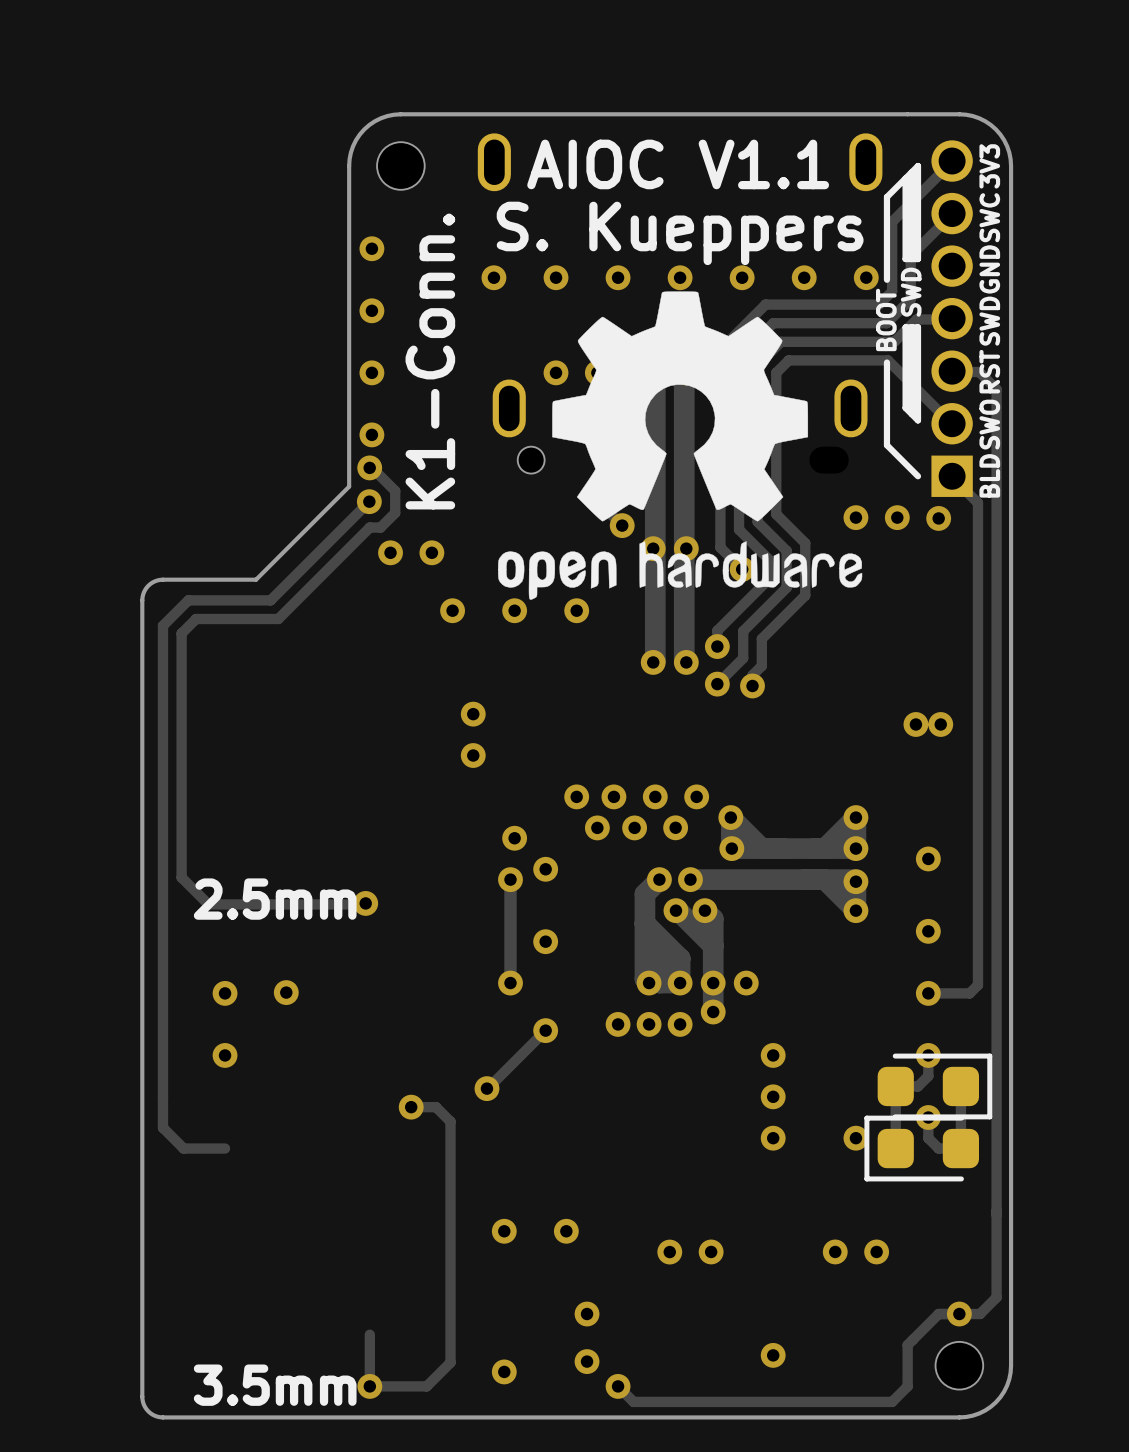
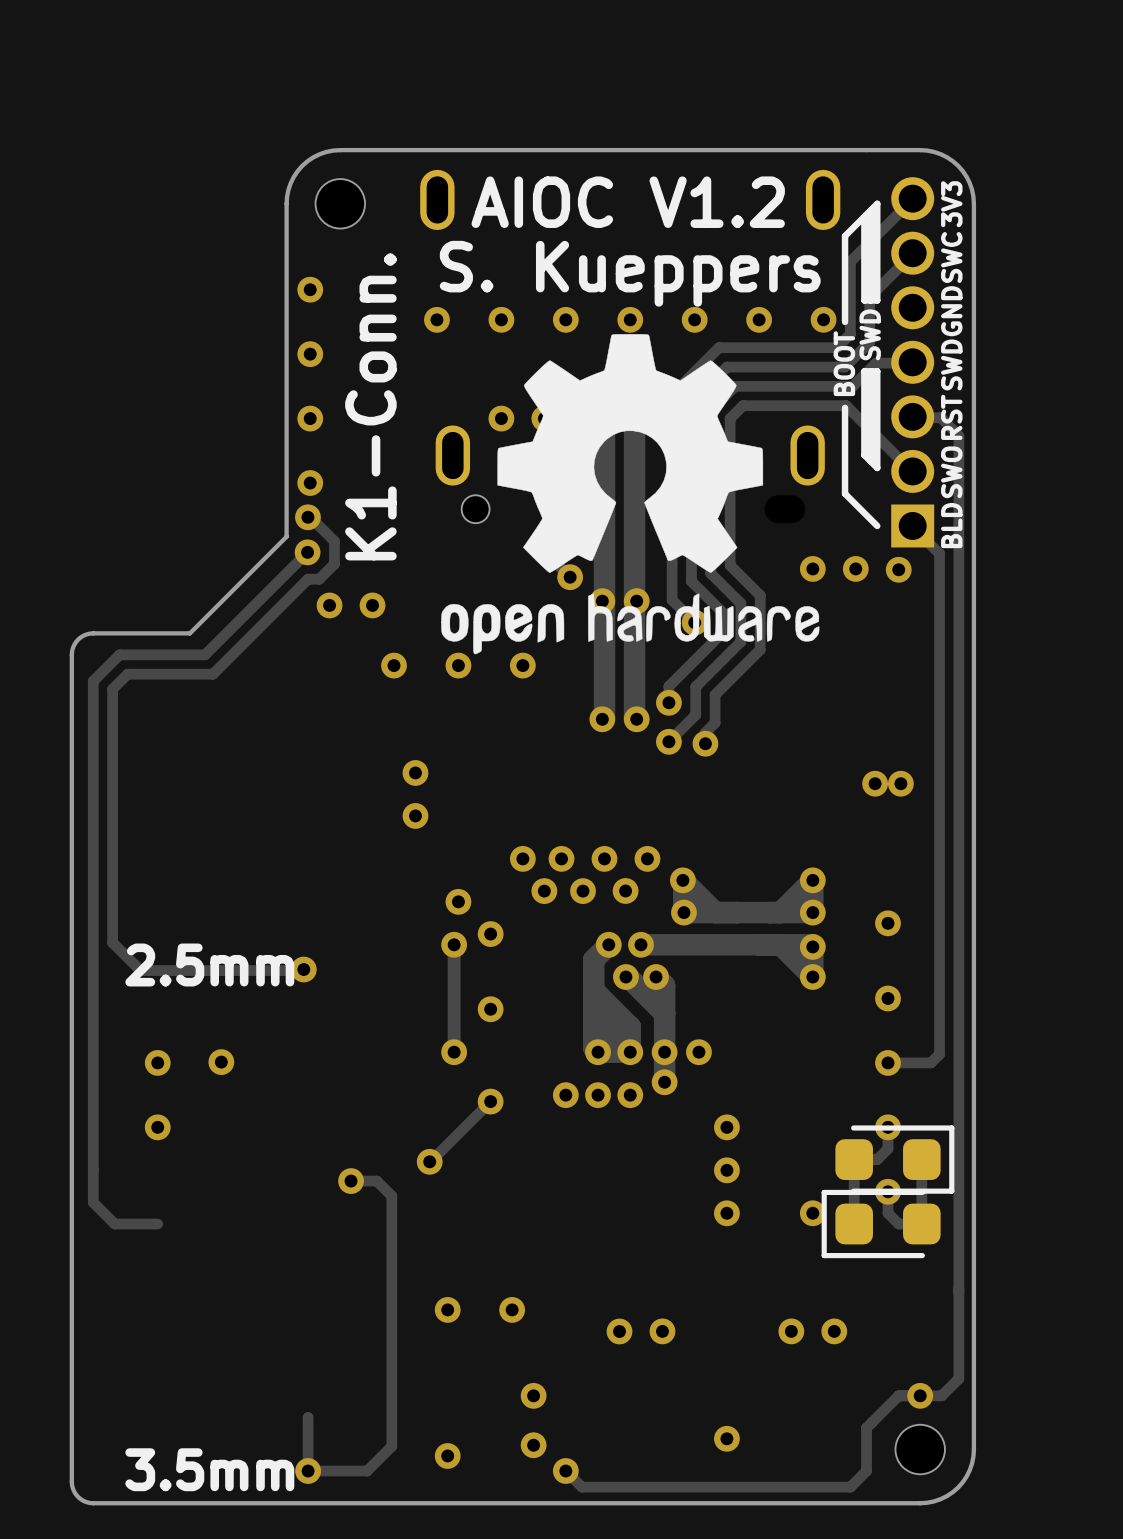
text: AIOC V1.1 (678, 164) -> AIOC V1.2 (628, 202)

